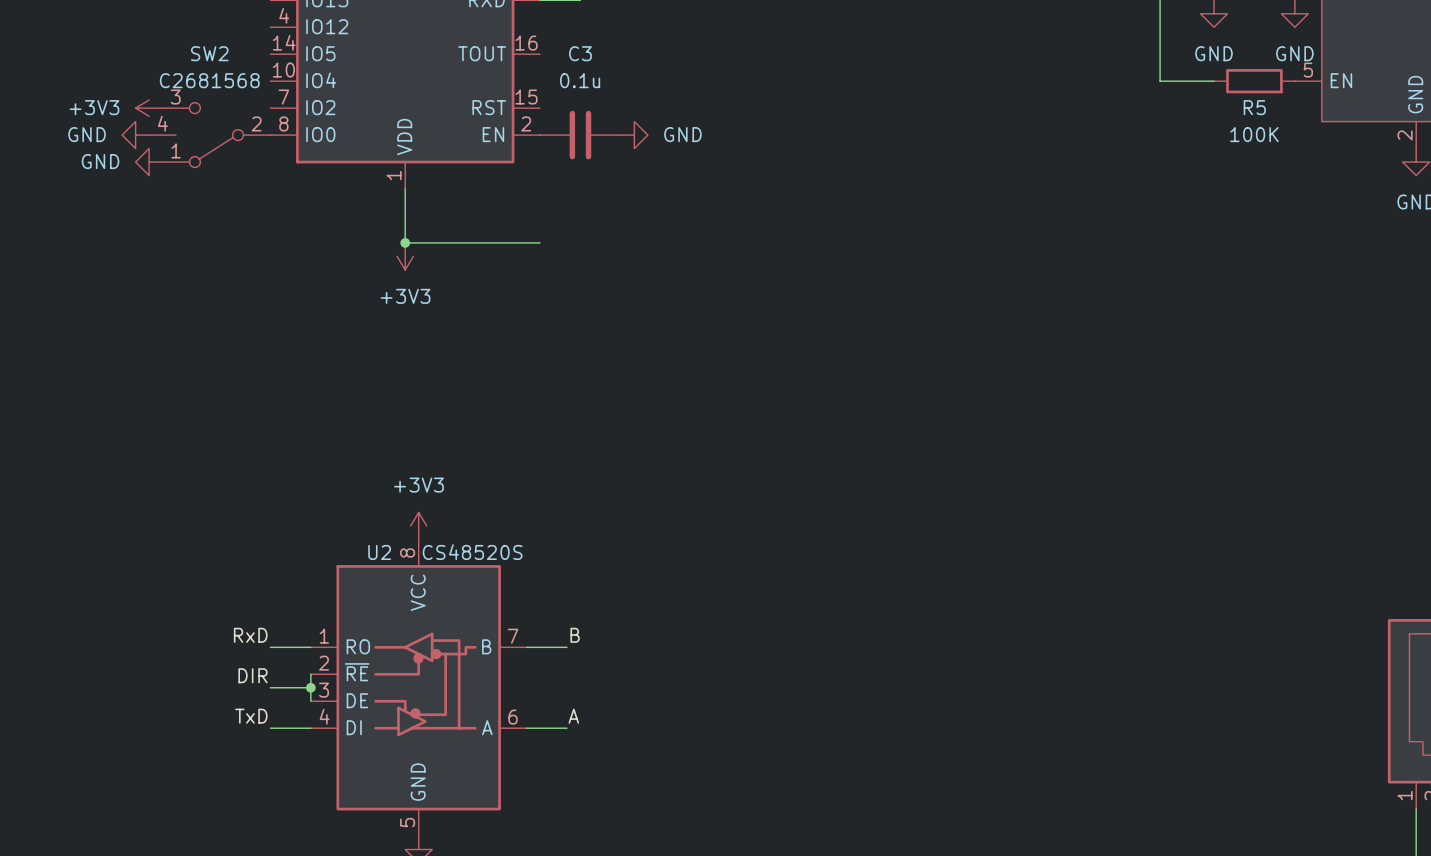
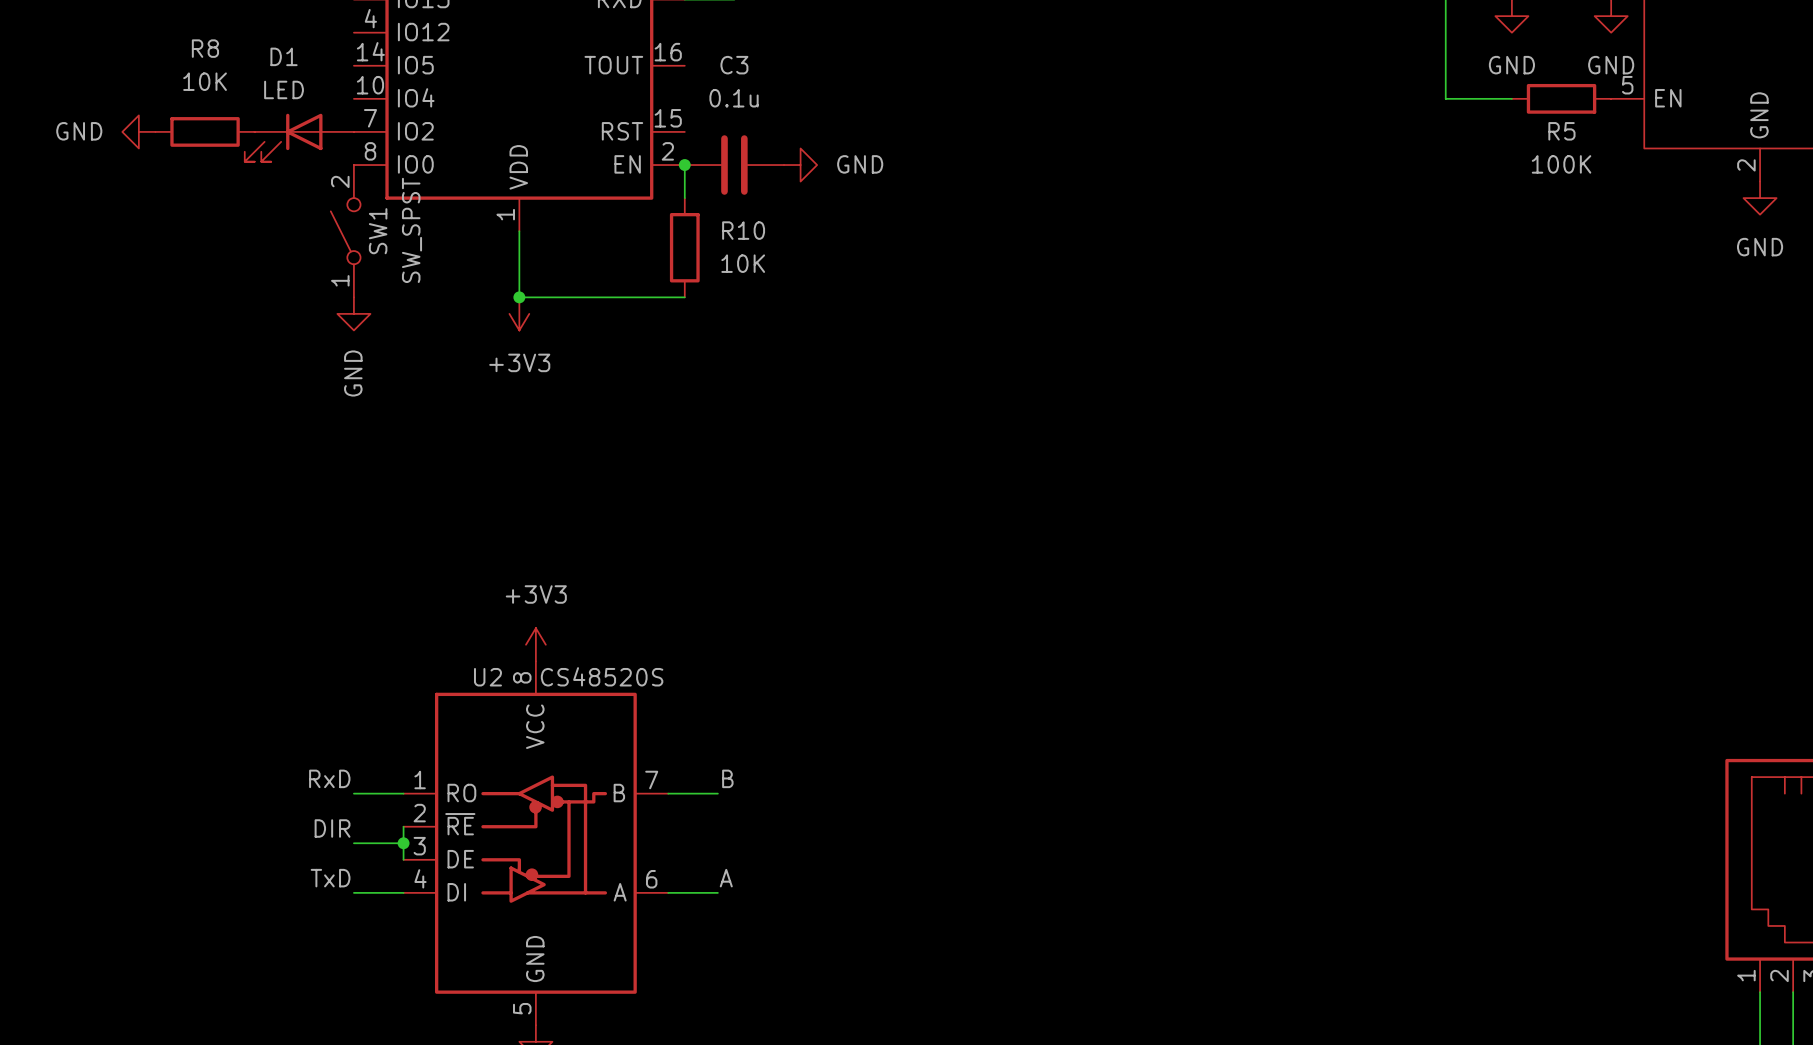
power symbol: none -> GND (138, 131)
power symbol: +3V3 (149, 108) -> none
R8: none -> 10K (205, 131)
D1: none -> LED (299, 137)
power symbol: GND (135, 135) -> none
SW2: C2681568 (209, 135) -> none
wire: none -> (684, 165) (684, 198)
junction: none -> (684, 165)
power symbol: GND (149, 162) -> none
SW1: none -> SW_SPST (345, 231)
R10: none -> 10K (684, 247)
power symbol: none -> GND (353, 313)

